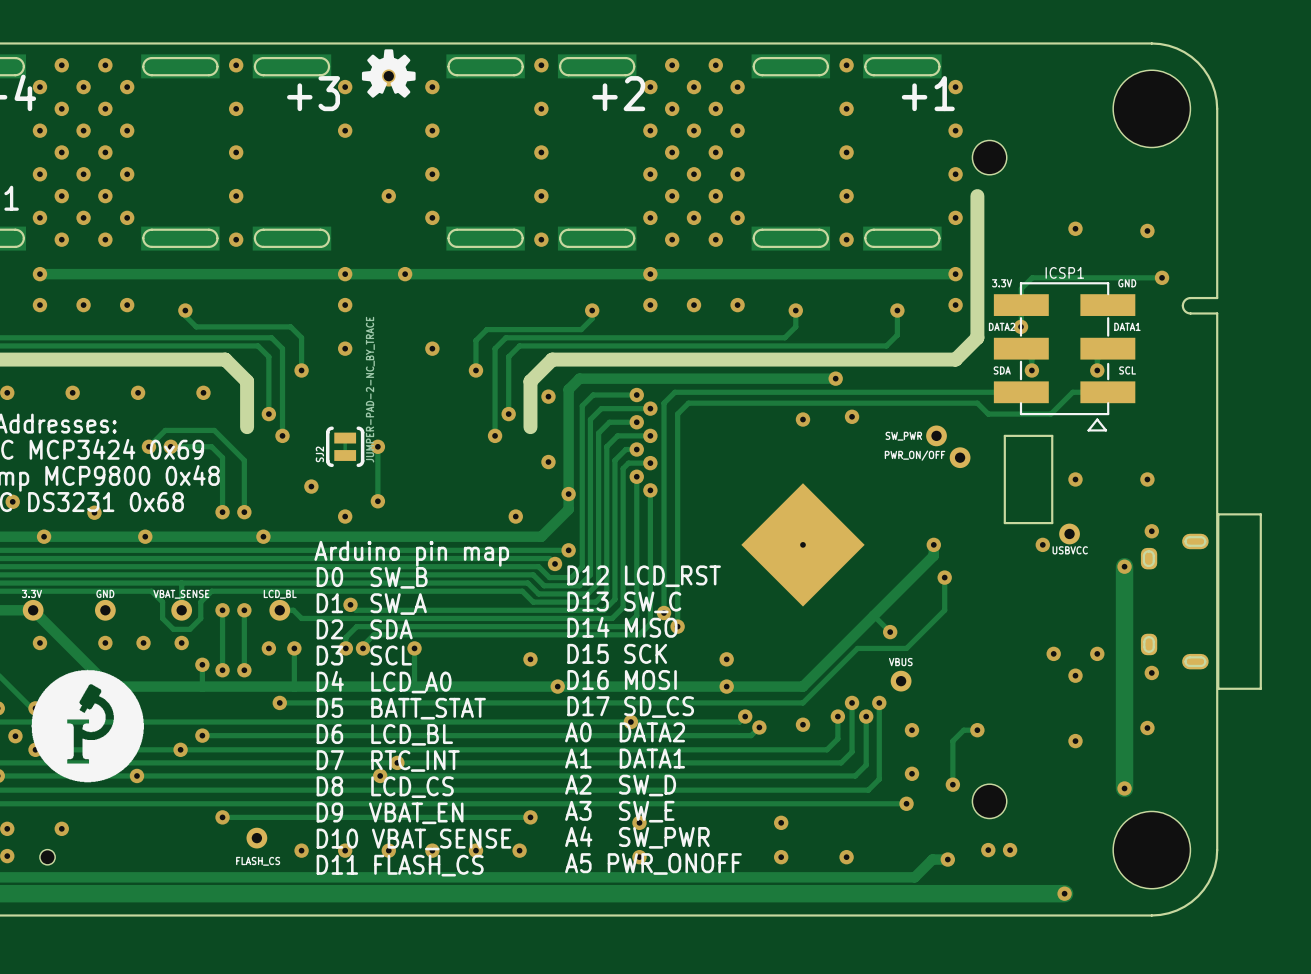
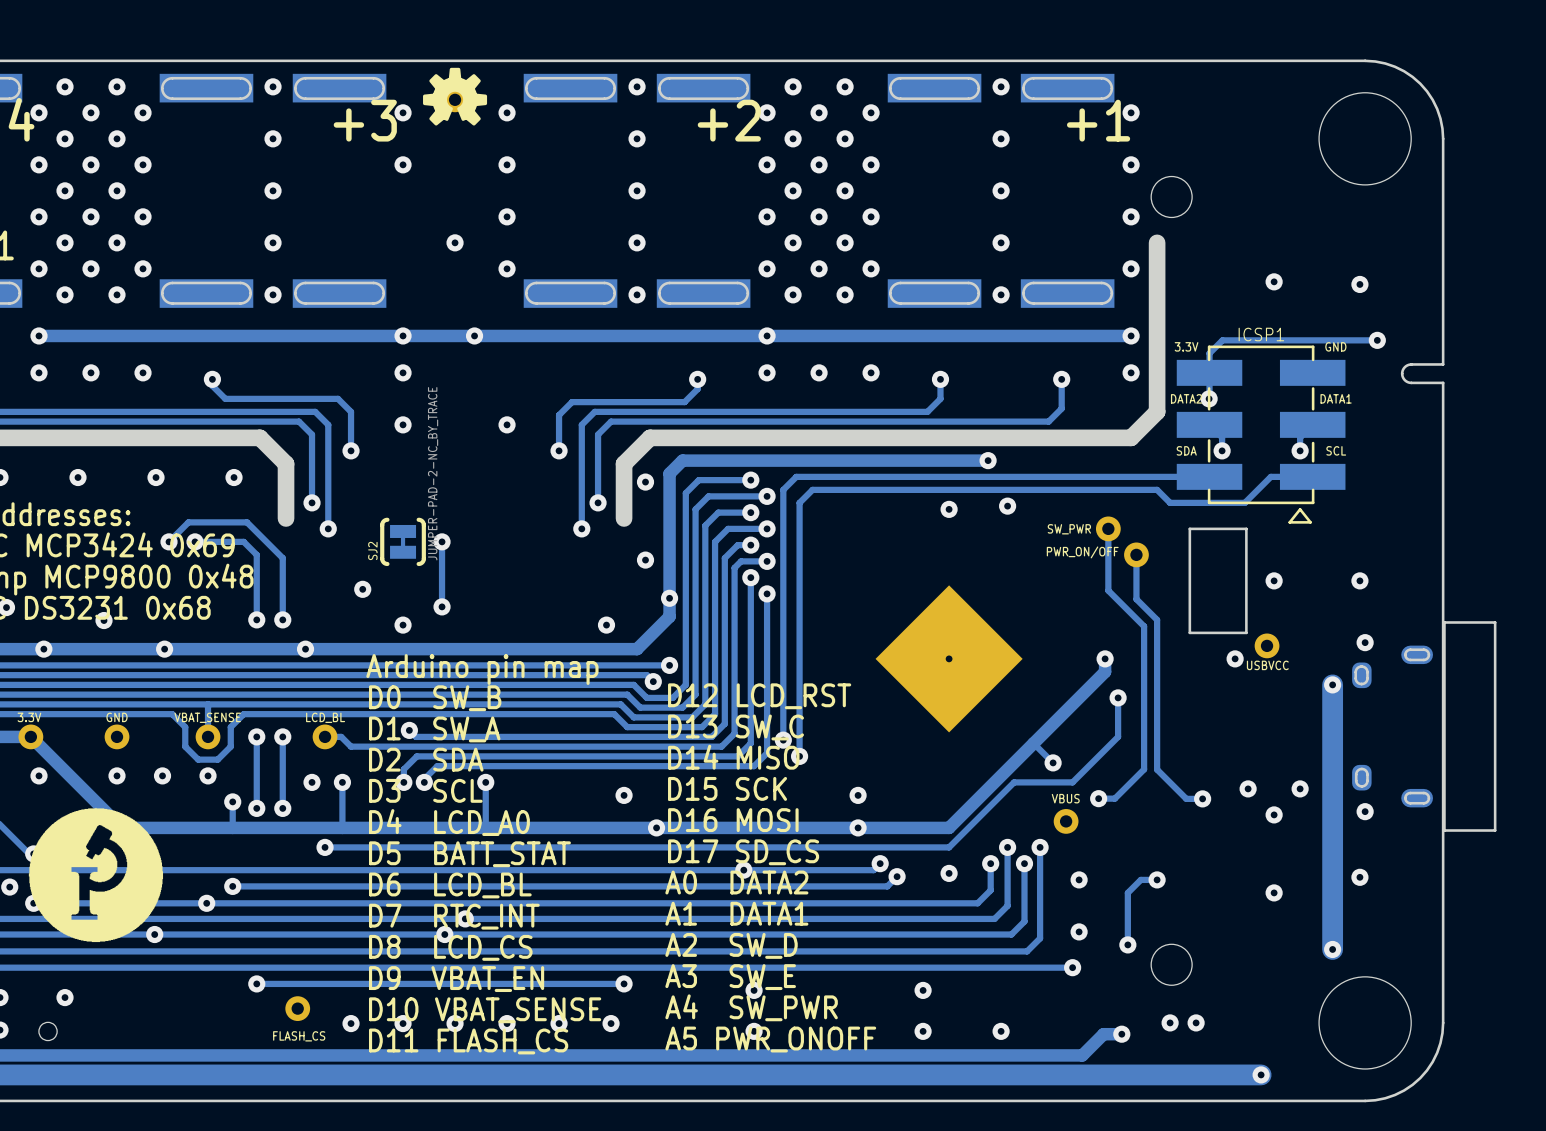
track: none -> (1108, 528) (1108, 590) (1144, 626) (1144, 769) (1114, 798) (1098, 798)
track: none -> (1136, 554) (1136, 599) (1157, 619) (1157, 769) (1186, 798) (1202, 798)
via: none -> (1098, 798)
via: none -> (1202, 798)

